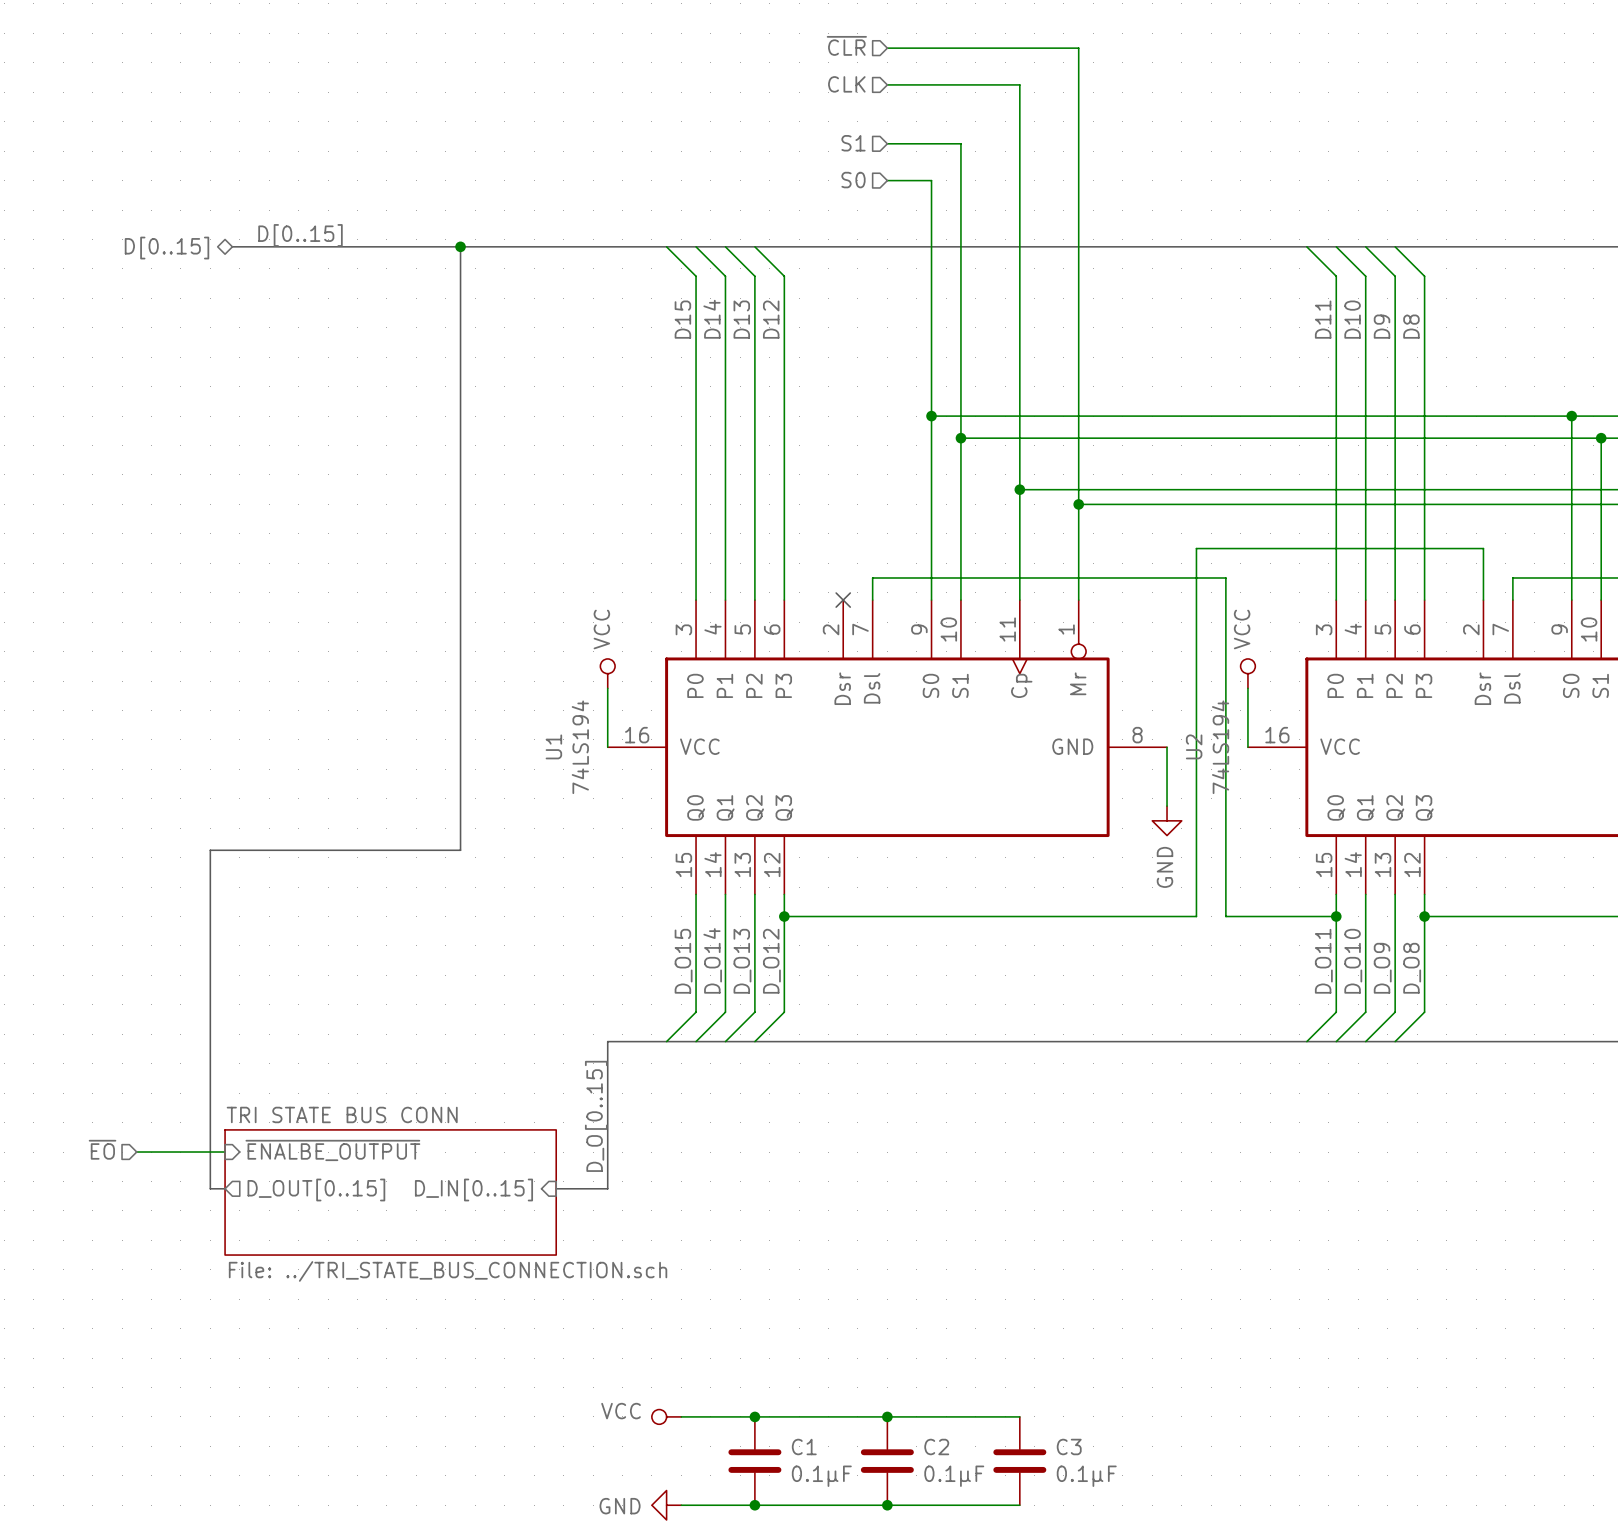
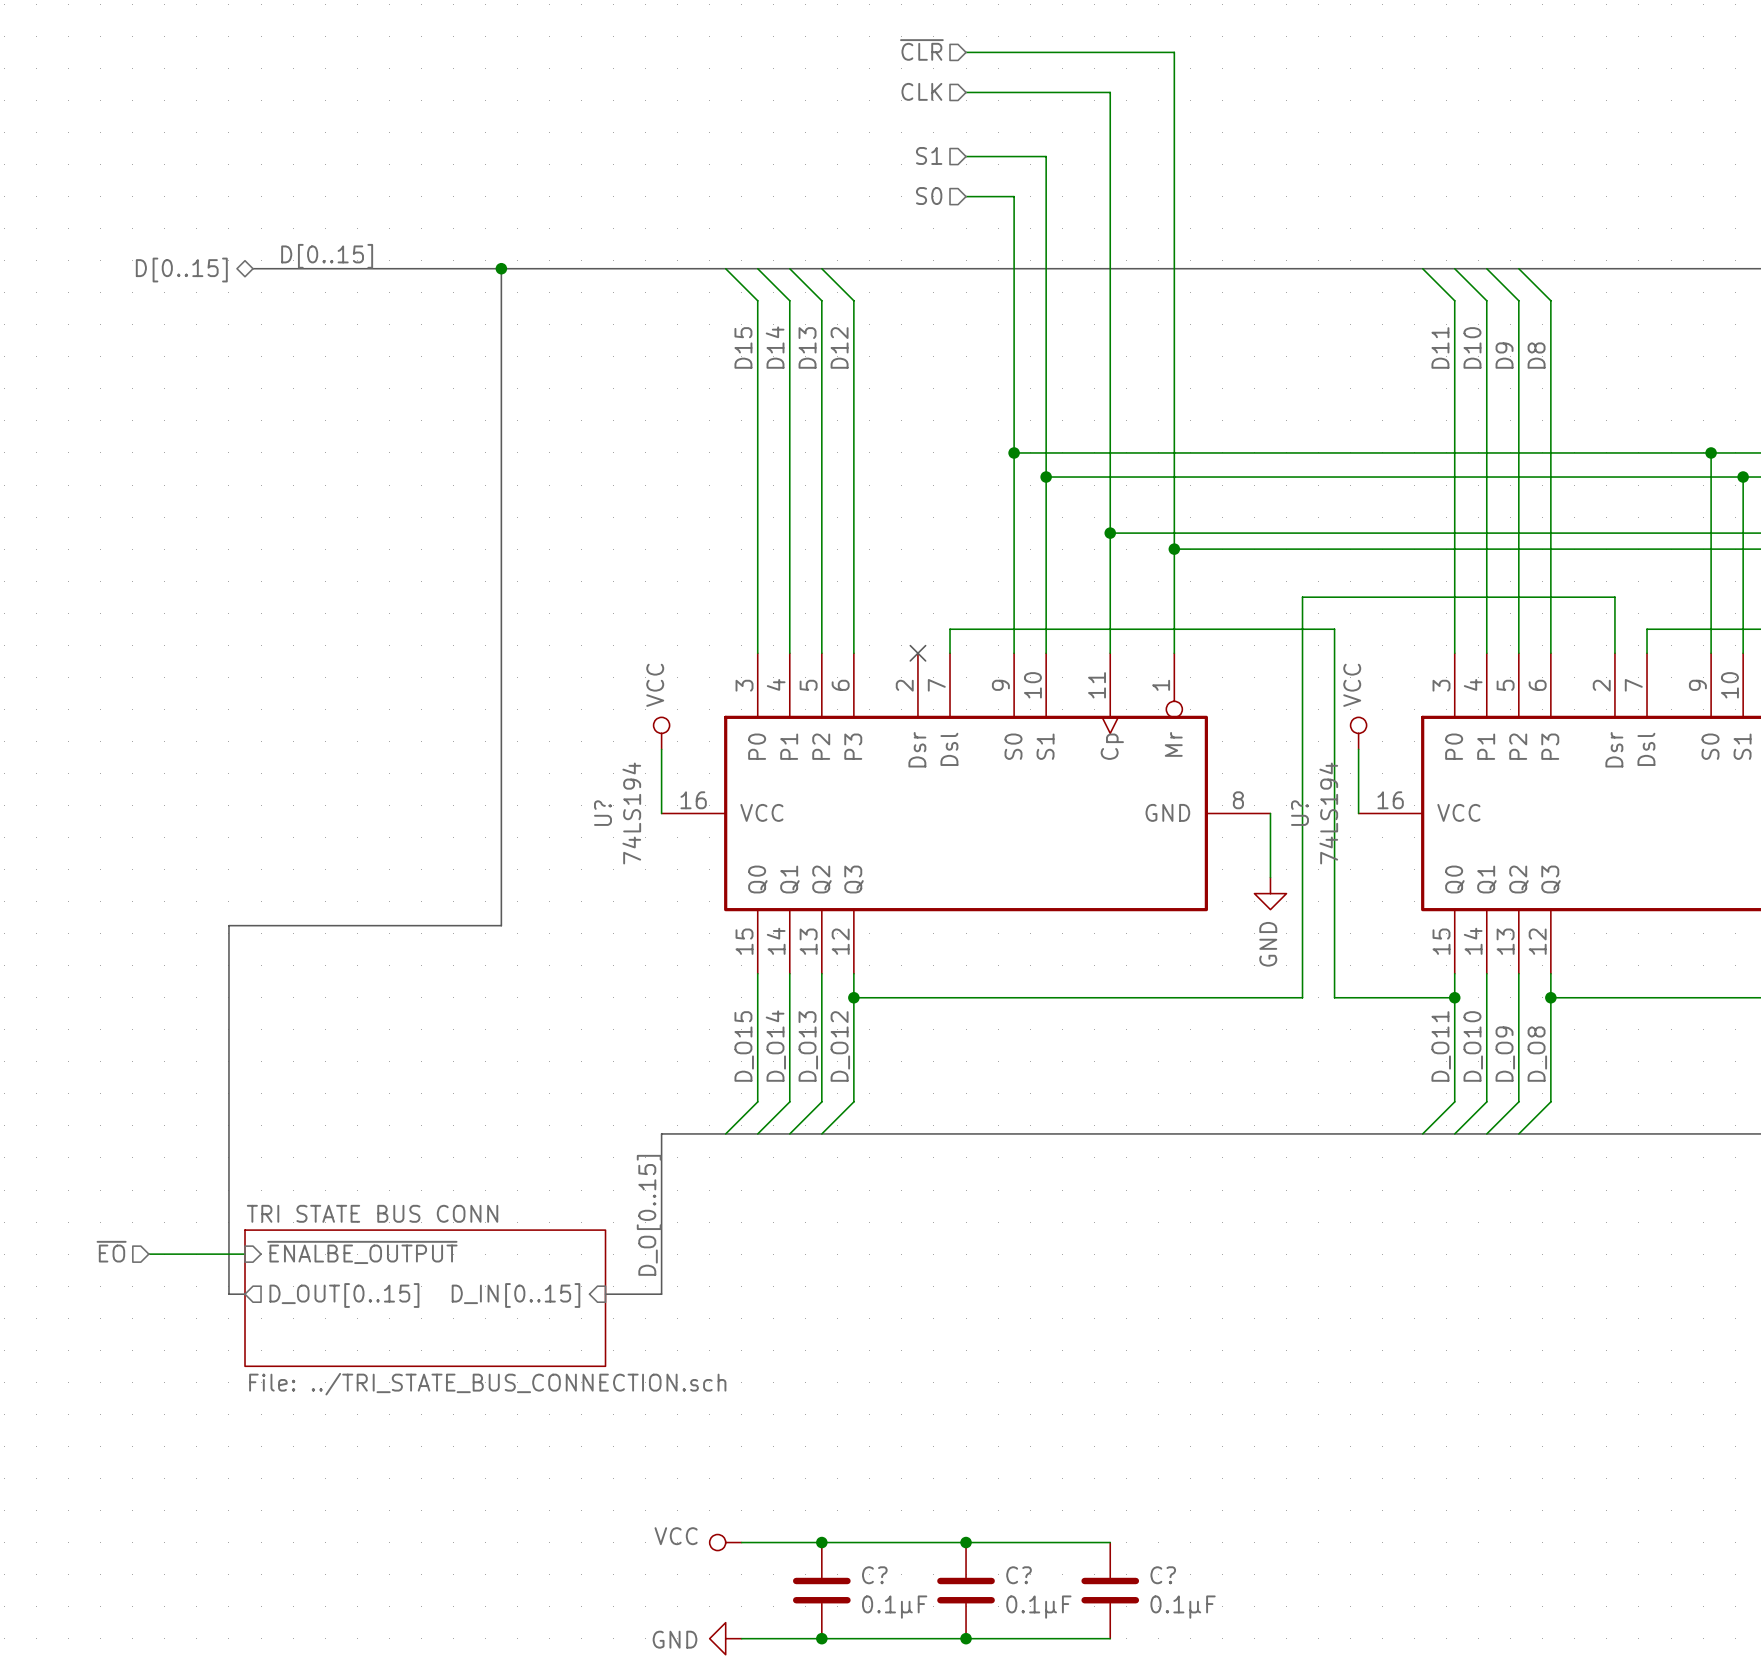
U1 name: U1 (553, 746) -> U? (602, 813)
U2 name: U2 (1194, 746) -> U? (1299, 813)
C1 name: C1 (804, 1446) -> C? (874, 1575)
C2 name: C2 (936, 1446) -> C? (1019, 1575)
C3 name: C3 (1069, 1446) -> C? (1163, 1575)

